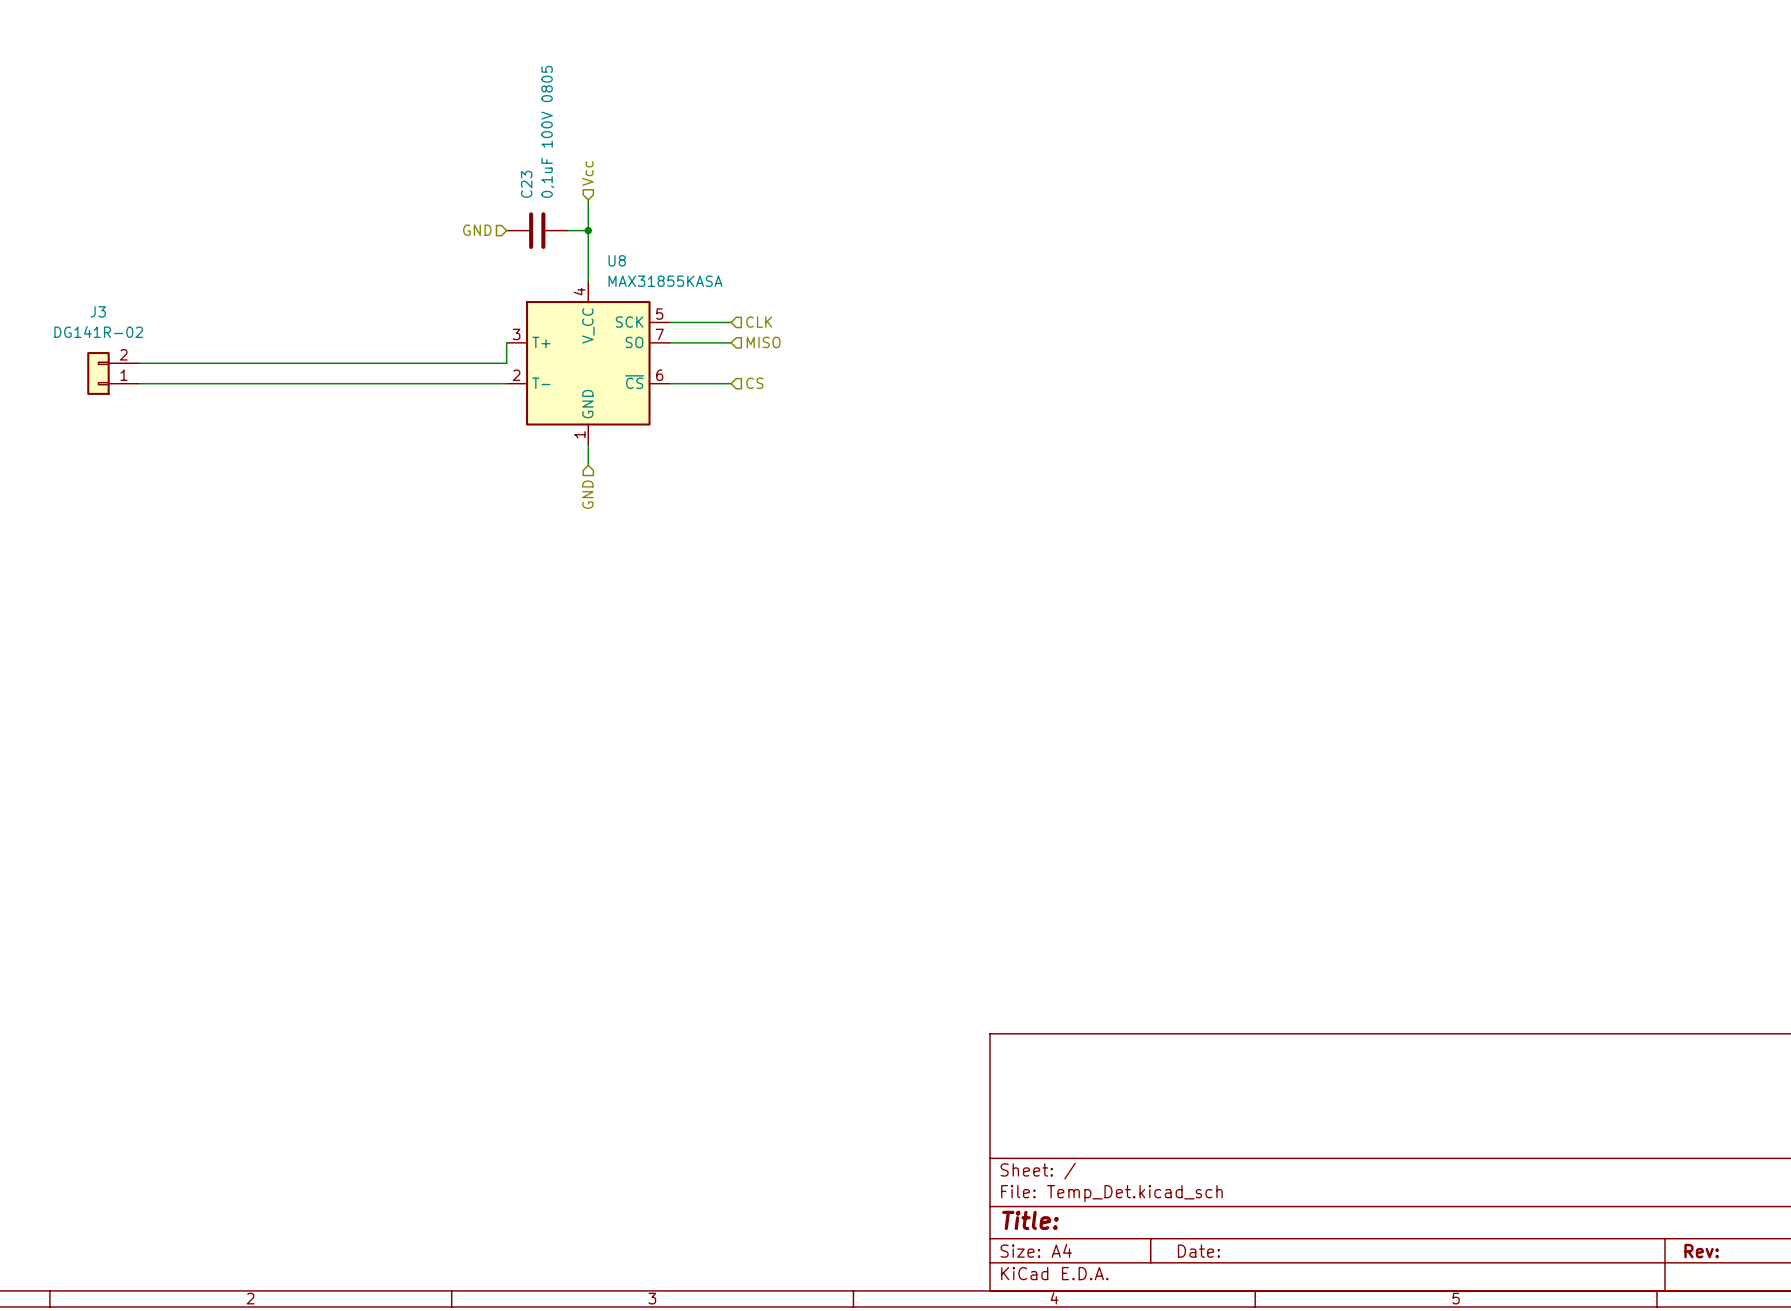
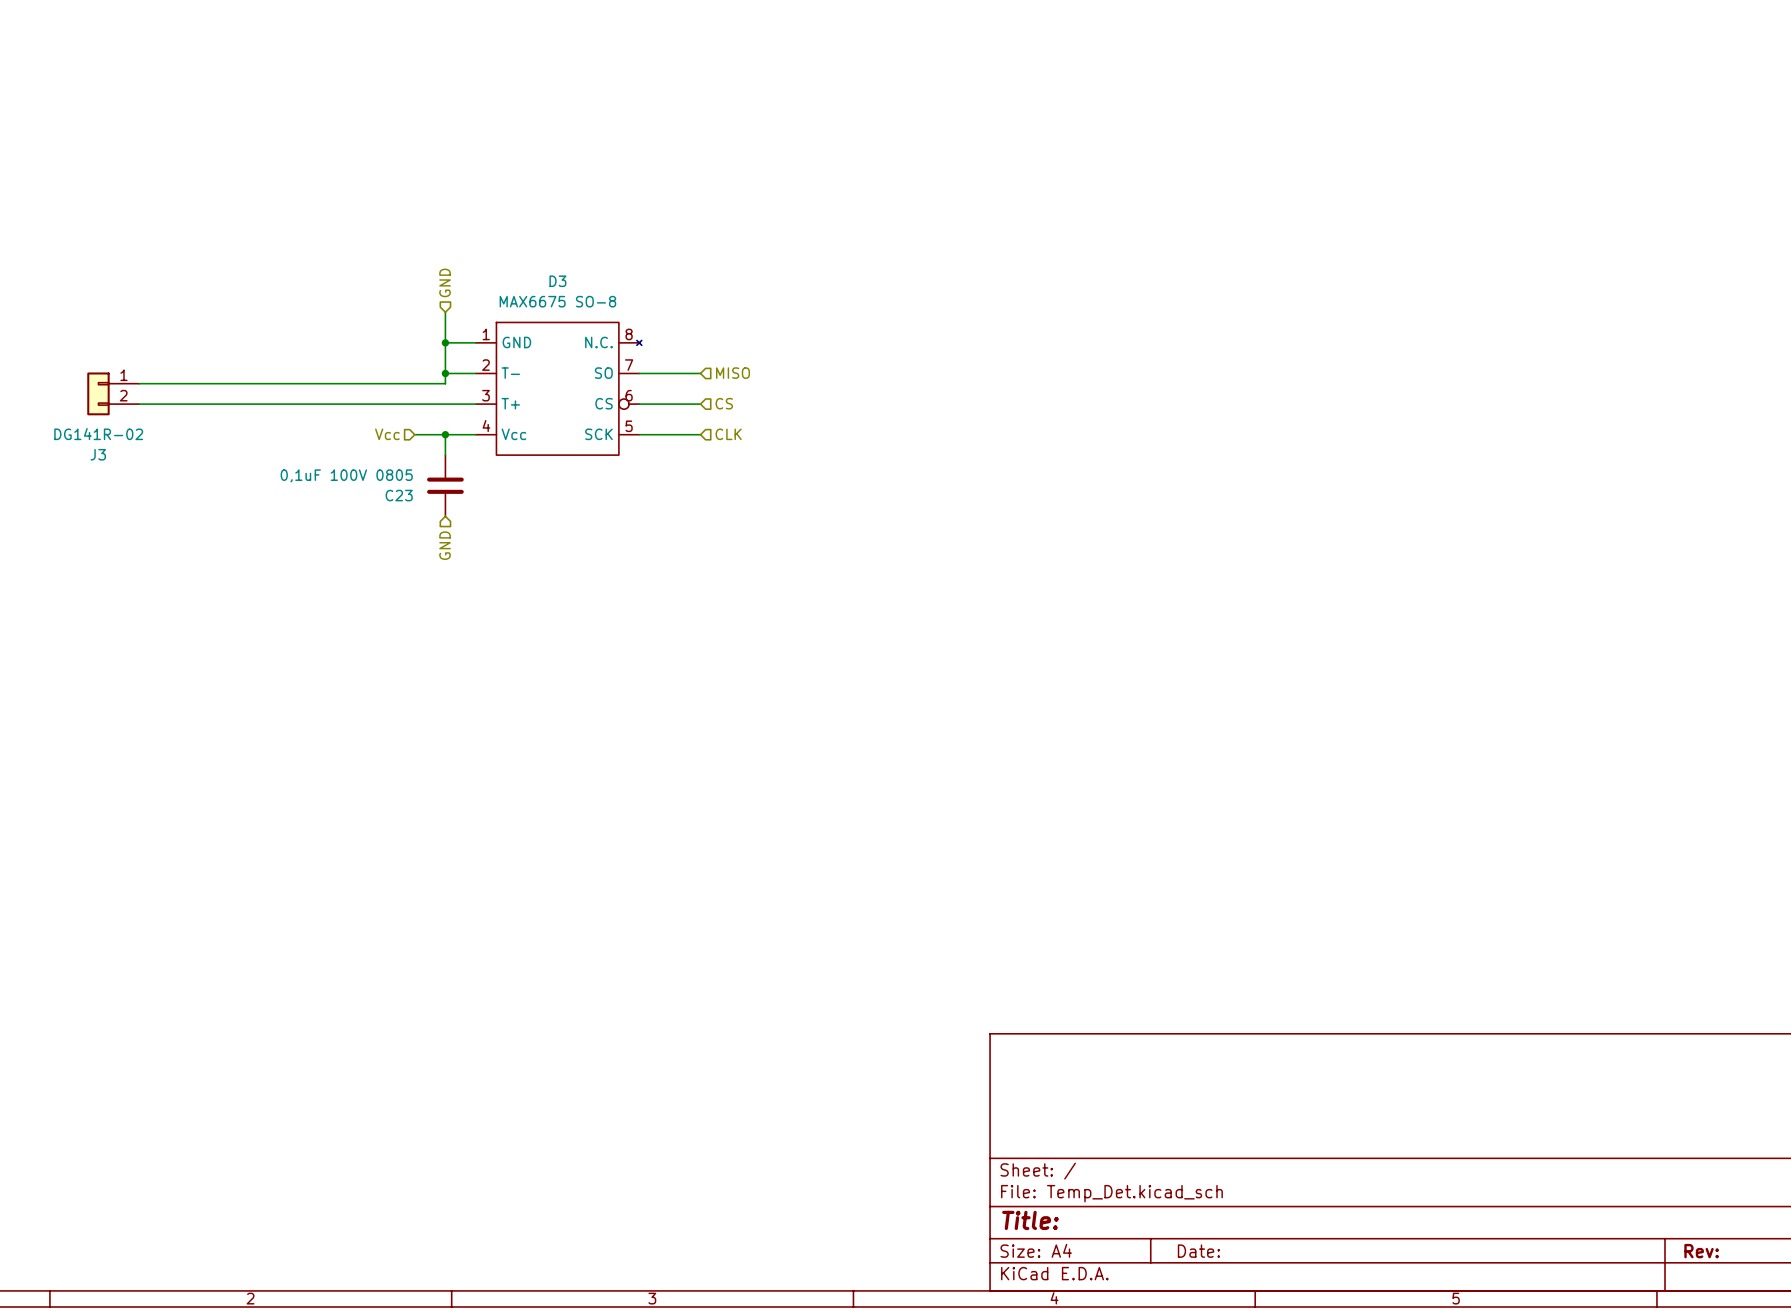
C23 value position: 0,1uF 100V 0805 (547, 131) -> 0,1uF 100V 0805 (346, 475)
hierarchical label: Vcc (587, 173) -> none
C23 name position: C23 (526, 184) -> C23 (399, 495)
wire: (588, 200) (588, 281) -> none
hierarchical label rotation: 0° (477, 230) -> 90° clockwise (445, 282)
hierarchical label position: GND (477, 230) -> GND (445, 282)
C23 rotation: 0° (537, 230) -> 90° clockwise (445, 485)
C23 position: (537, 230) -> (445, 485)
wire: (567, 230) (588, 230) -> none
junction: (588, 230) -> none
wire: (669, 322) (731, 322) -> (639, 373) (700, 373)
hierarchical label position: CLK (759, 322) -> CLK (728, 434)
wire: none -> (445, 342) (476, 342)
junction: none -> (445, 342)
wire: (506, 342) (506, 363) (139, 363) -> none
wire: (669, 342) (731, 342) -> (639, 404) (700, 404)
hierarchical label position: MISO (763, 342) -> MISO (733, 373)
U8: MAX31855KASA (588, 363) -> none
J3 flip: as is (98, 373) -> up-down (98, 393)
wire: none -> (445, 373) (476, 373)
junction: none -> (445, 373)
wire: (445, 383) (506, 383) -> (445, 383) (445, 312)
wire: (669, 383) (731, 383) -> (639, 434) (700, 434)
hierarchical label position: CS (754, 383) -> CS (724, 403)
D3: none -> MAX6675 SO-8 (558, 388)
wire: none -> (139, 404) (476, 404)
hierarchical label: none -> Vcc (387, 434)
wire: none -> (414, 434) (476, 434)
junction: none -> (445, 434)
wire: (588, 444) (588, 465) -> (445, 434) (445, 455)
hierarchical label: GND (587, 494) -> none
hierarchical label: none -> GND (445, 545)

